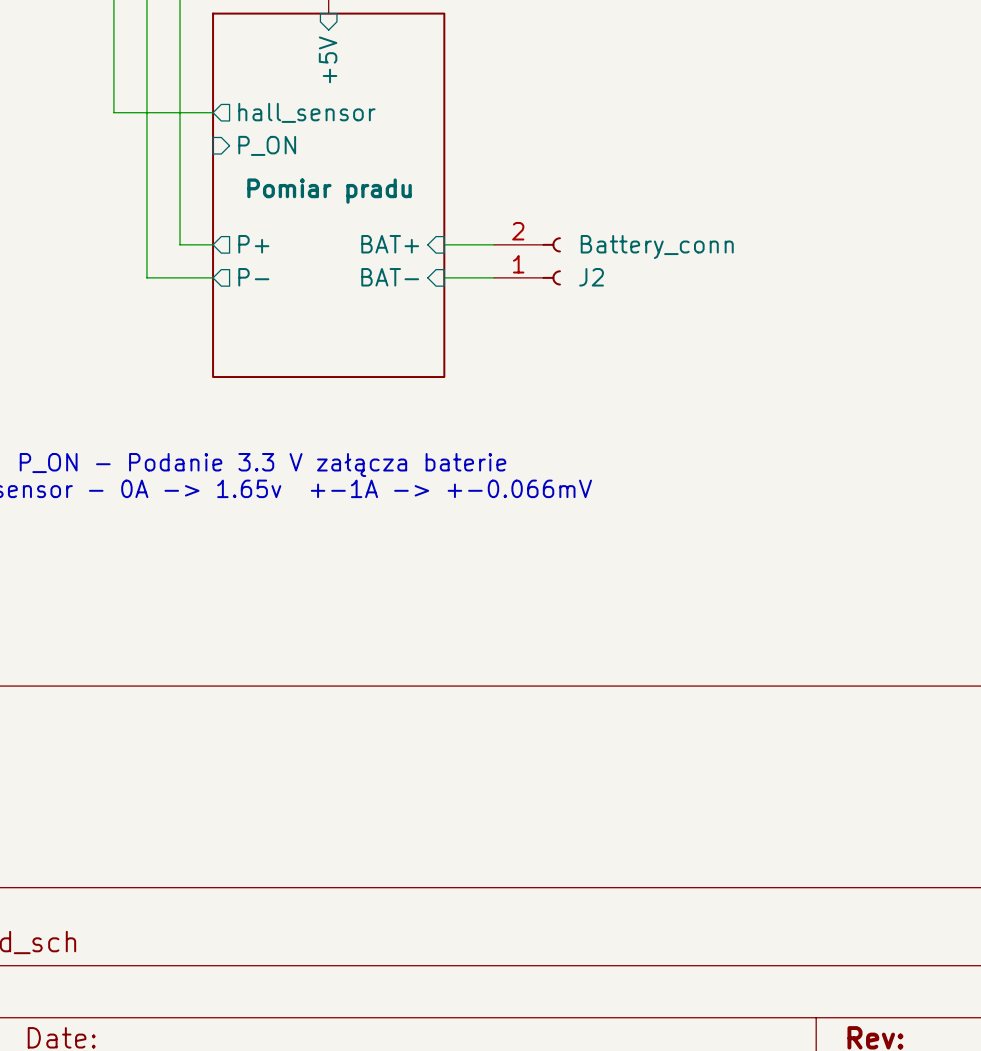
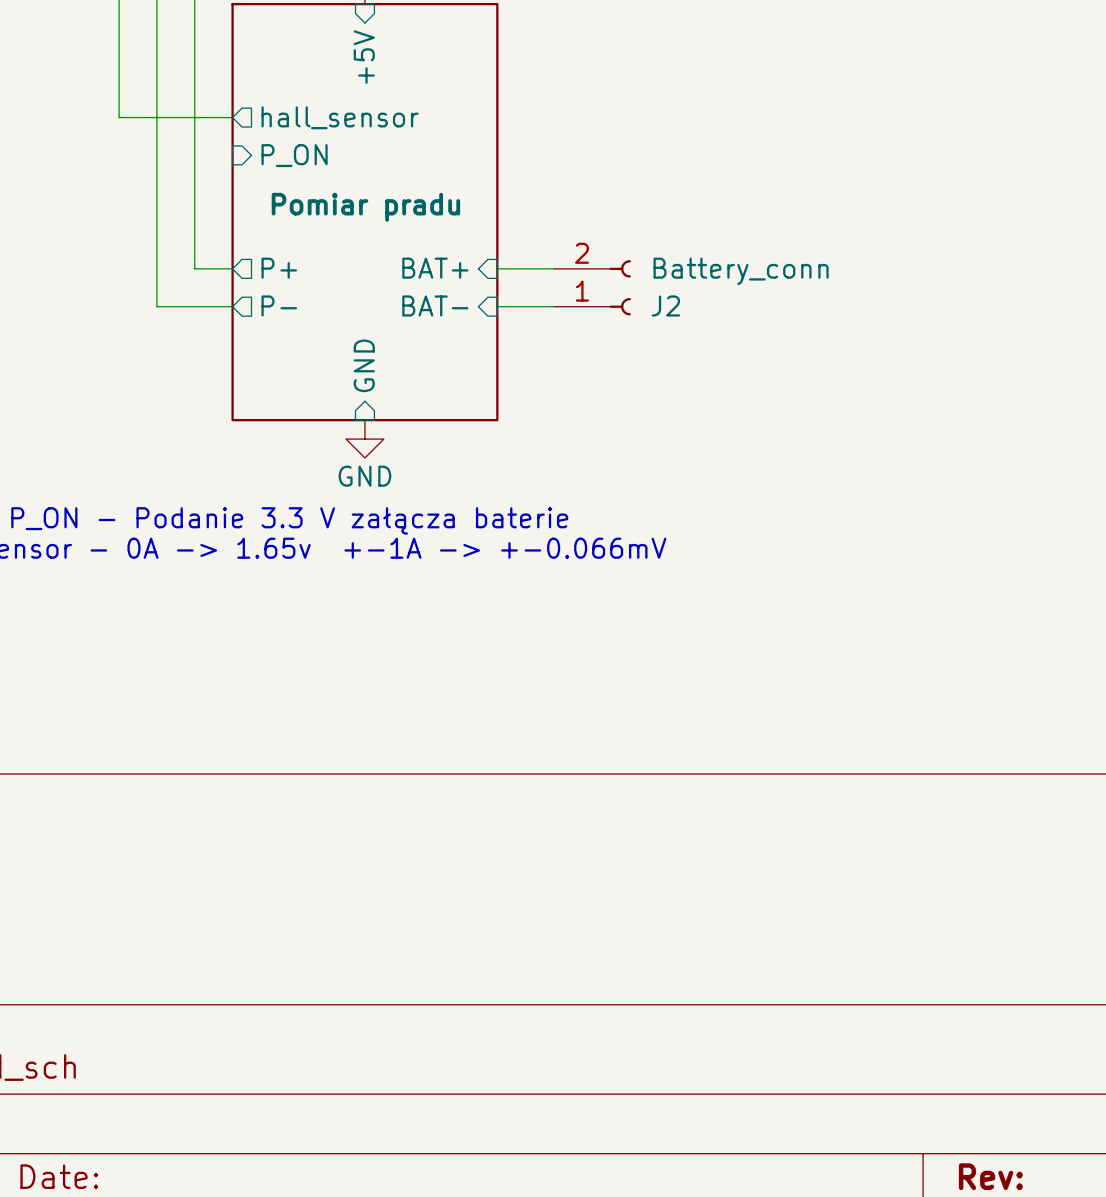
sheet pin: none -> GND (364, 365)
power symbol: none -> GND (364, 439)

